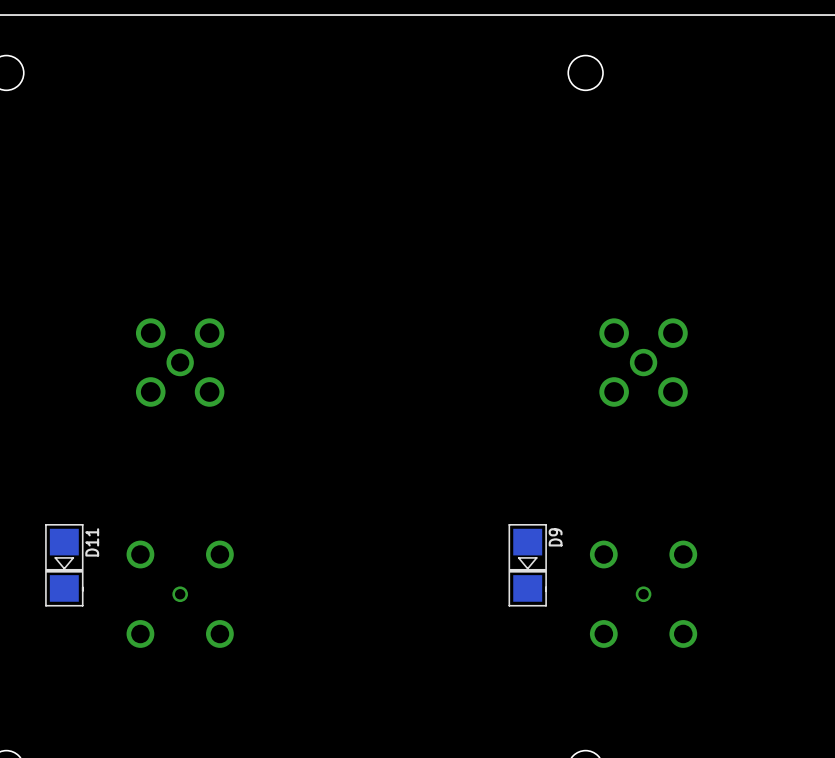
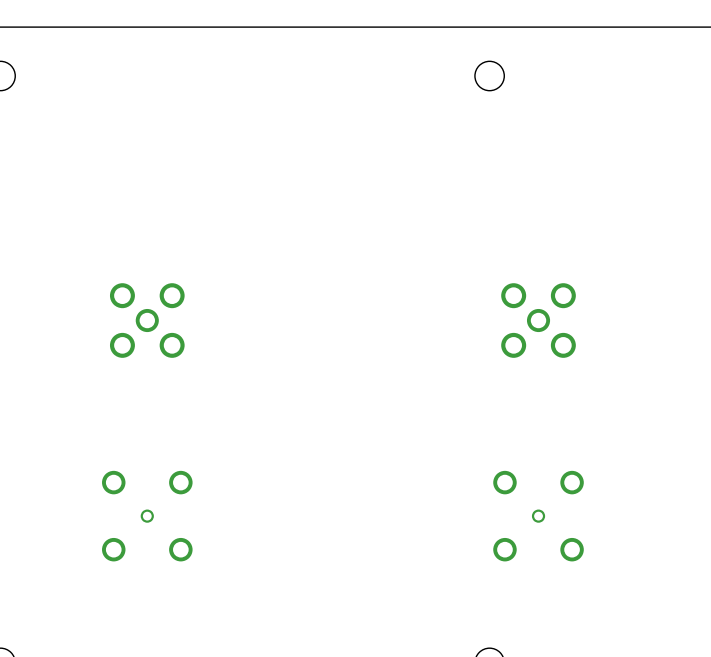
D11: (64, 565) -> none
D9: (527, 565) -> none

